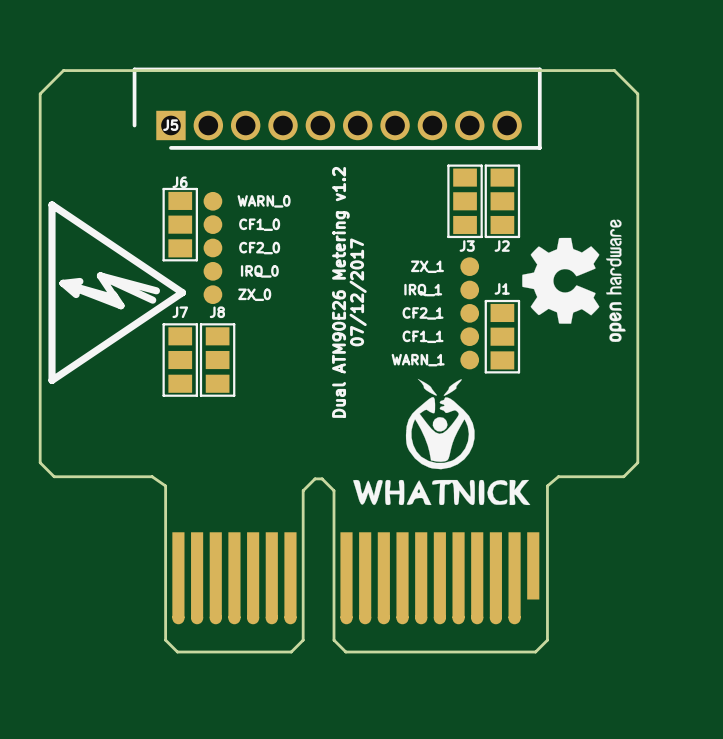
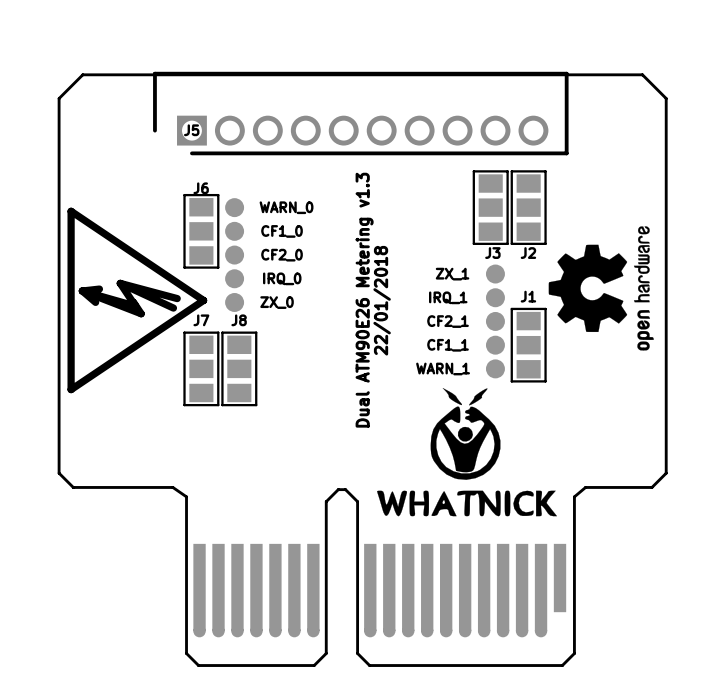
text: Dual ATM90E26 Metering v1.2 (340, 292) -> Dual ATM90E26 Metering v1.3 (364, 300)
text: 07/12/2017 (358, 292) -> 22/01/2018 (382, 300)

